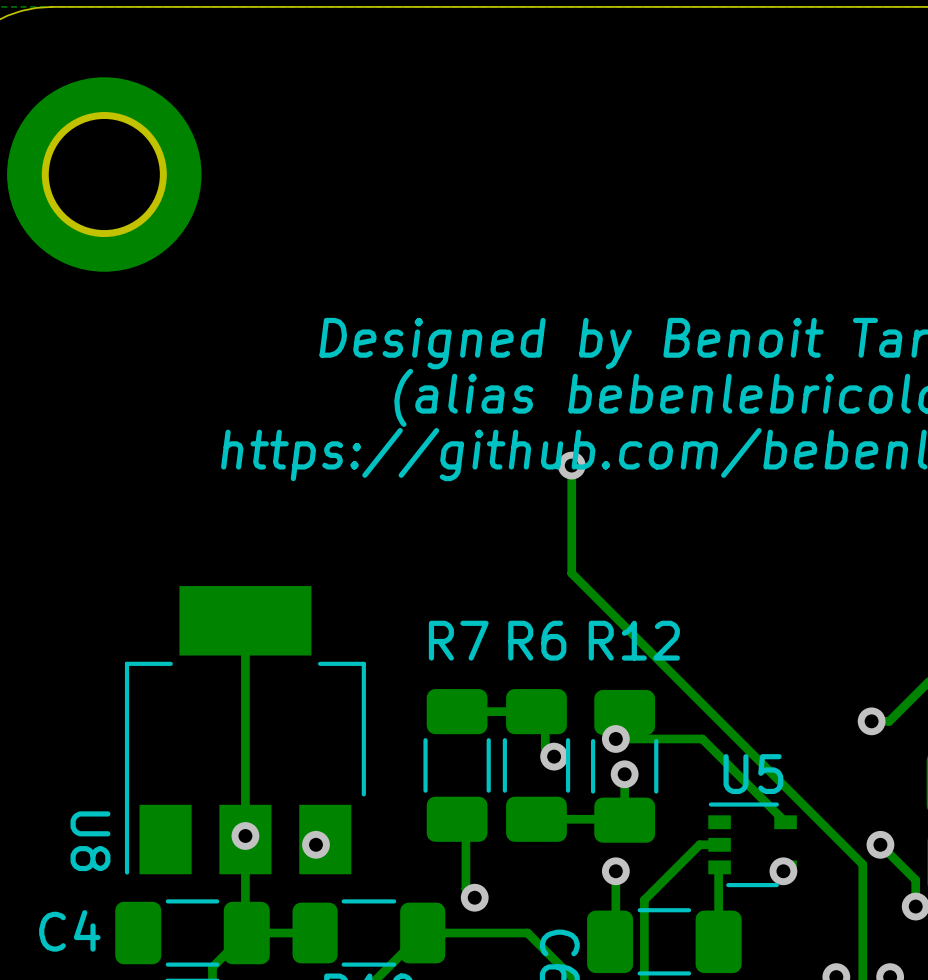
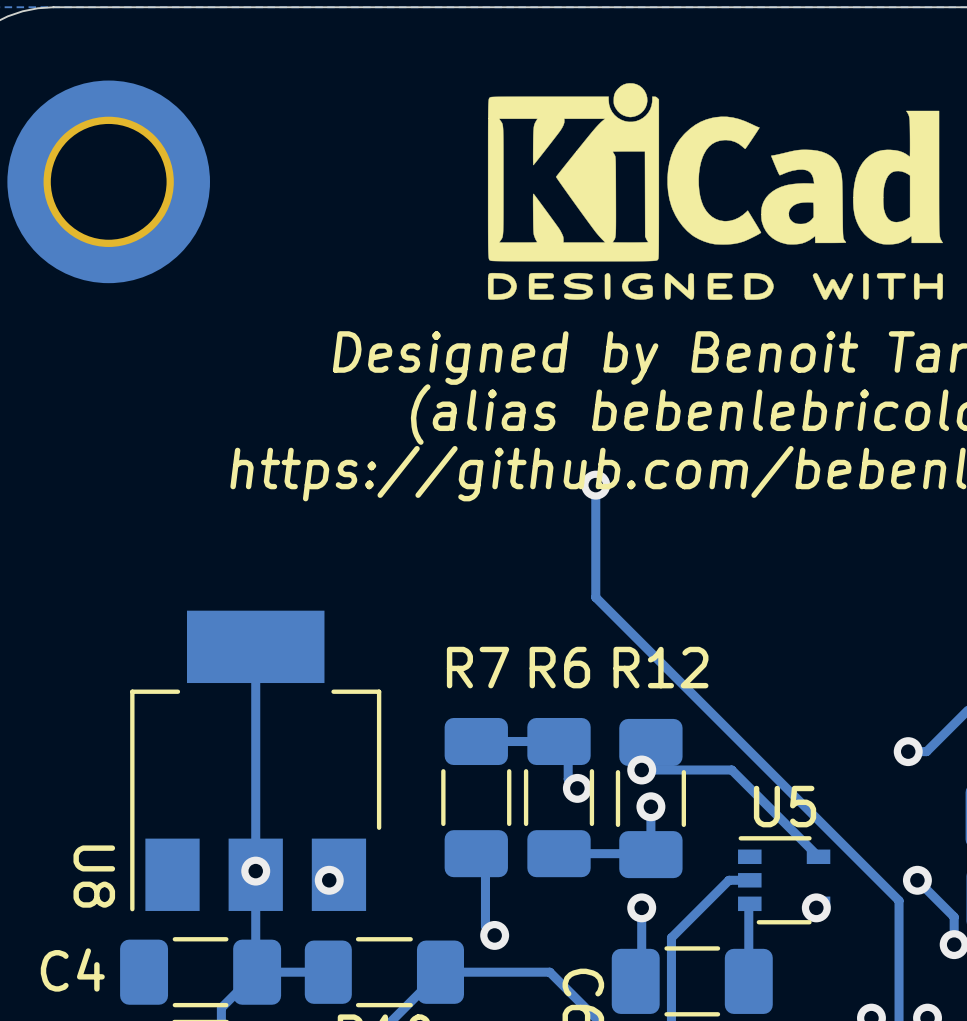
drawing: none -> [487, 83, 943, 300]

